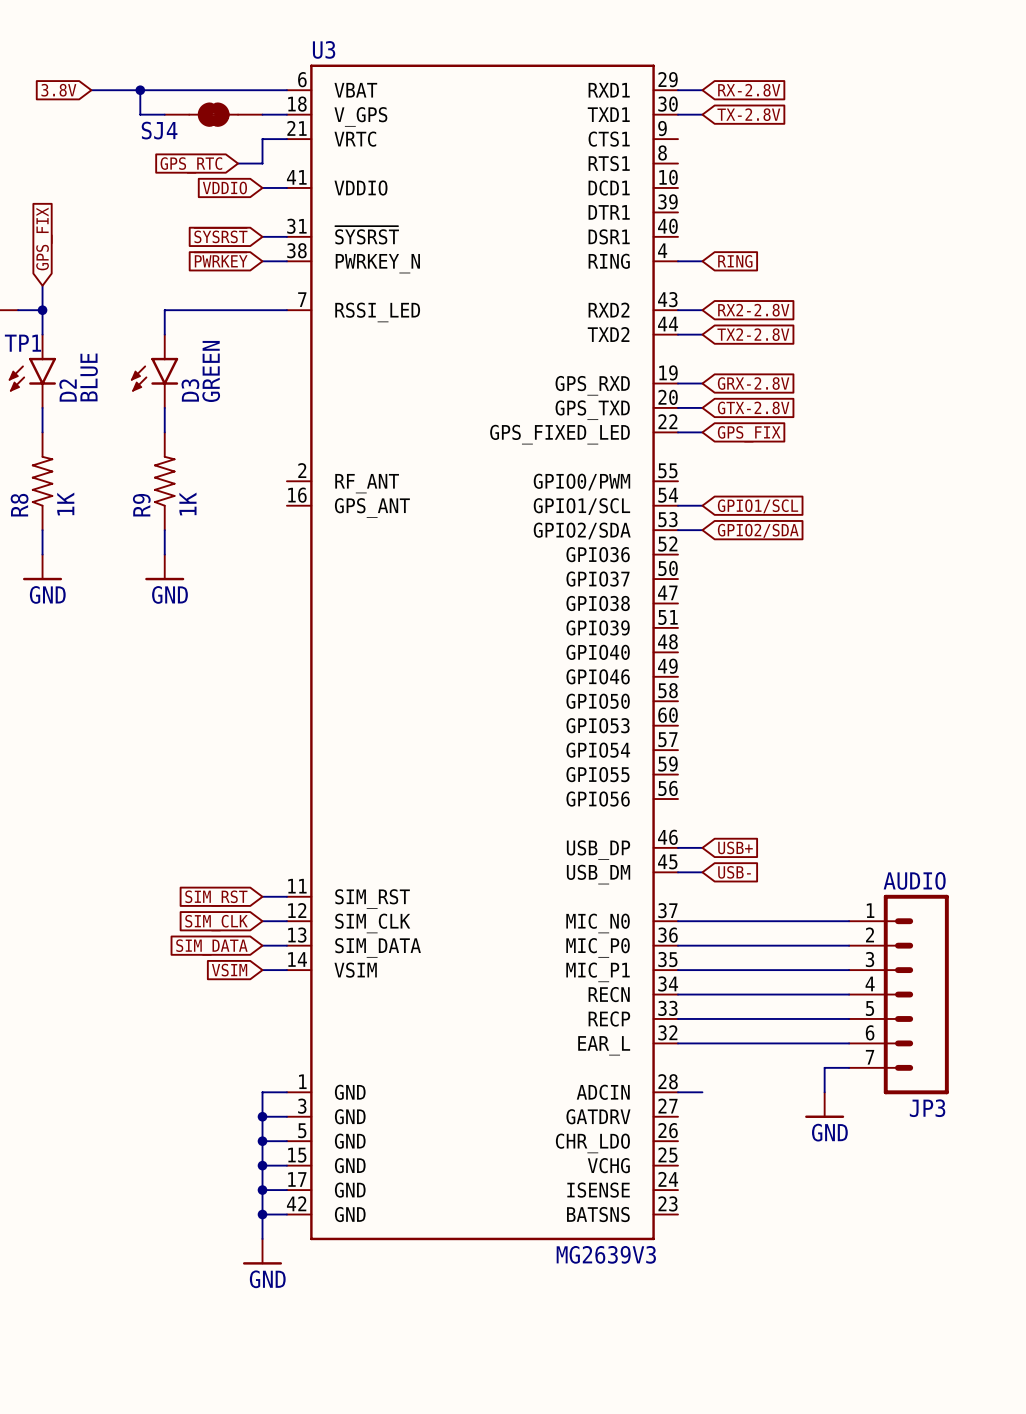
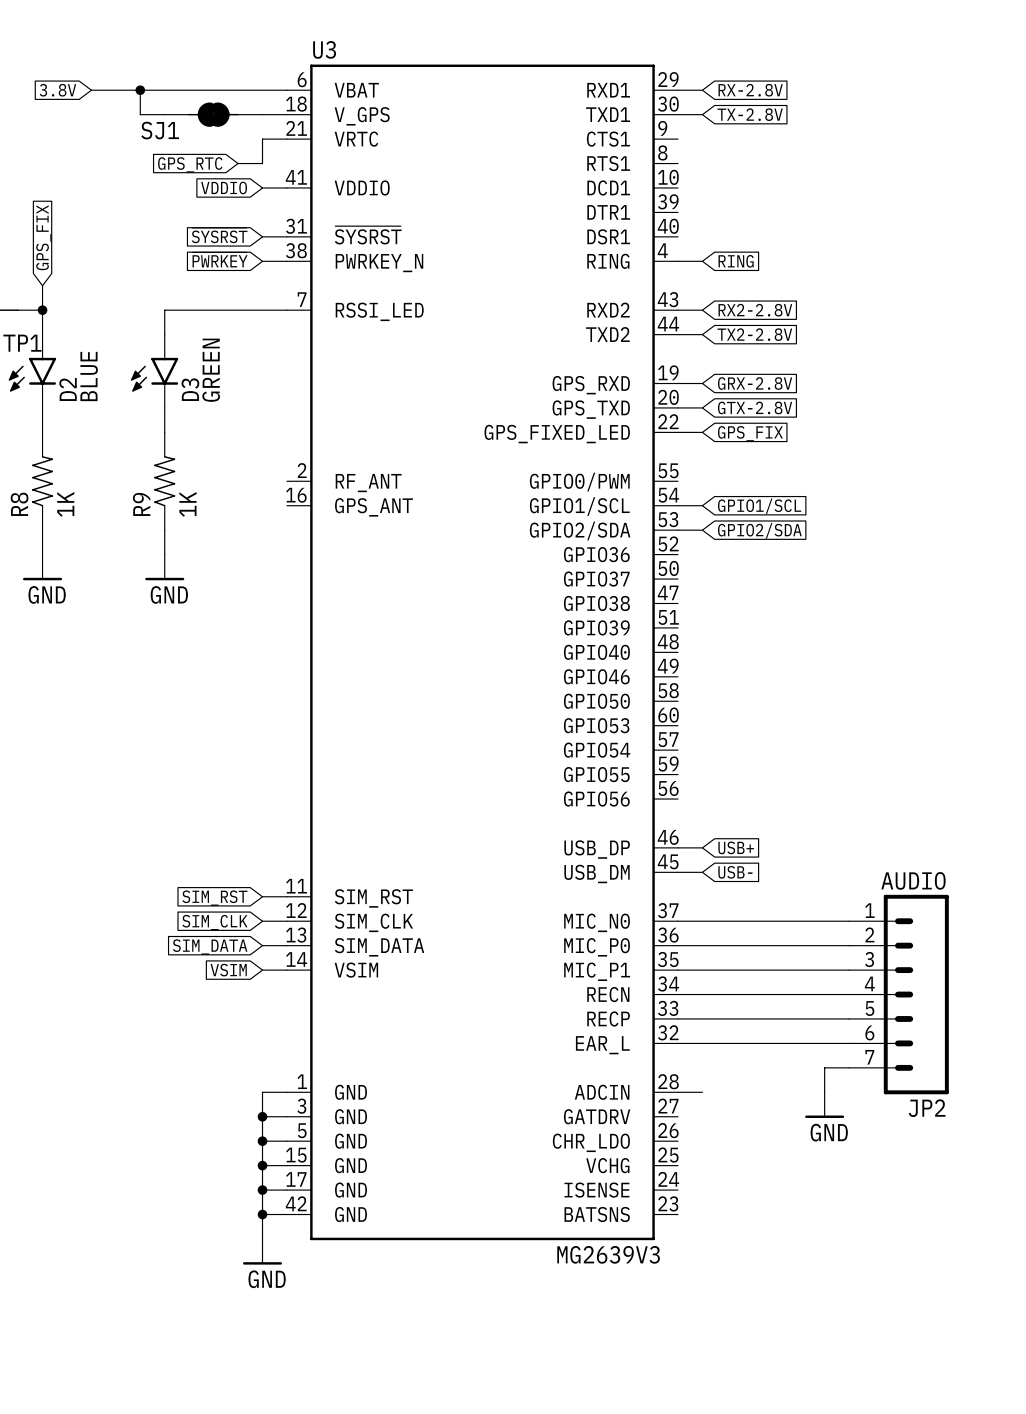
SJ4 name: SJ4 (159, 130) -> SJ1 (160, 130)
JP3 name: JP3 (927, 1108) -> JP2 (927, 1108)

